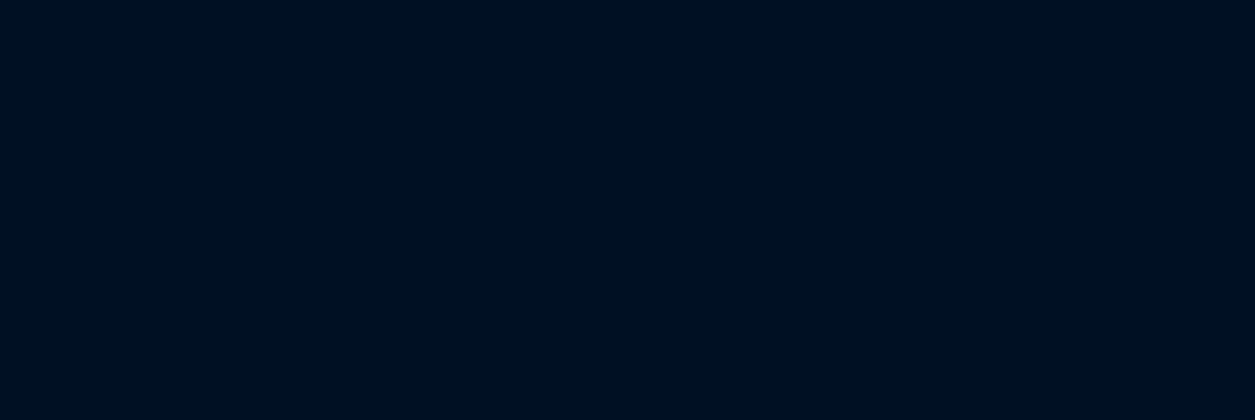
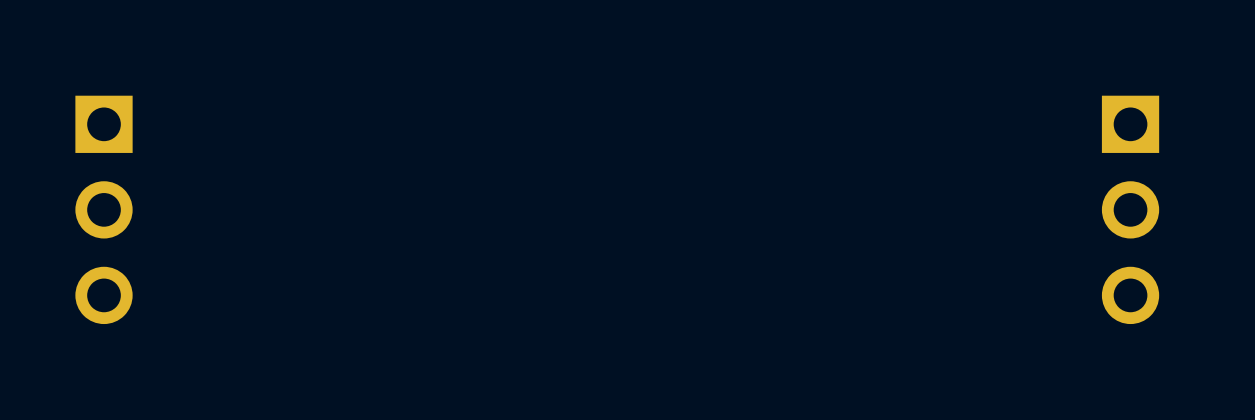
part: none -> (104, 209)
part: none -> (1130, 209)

